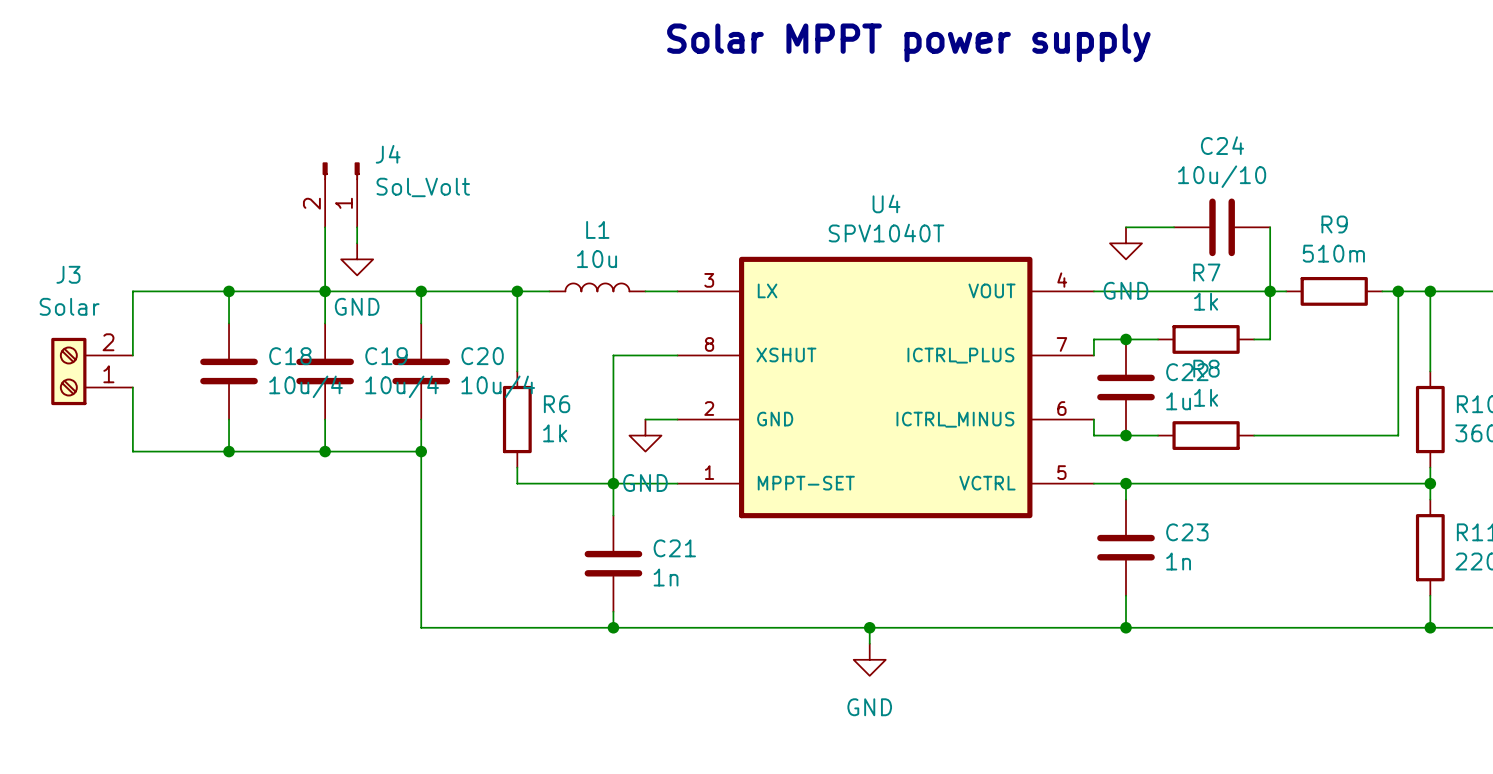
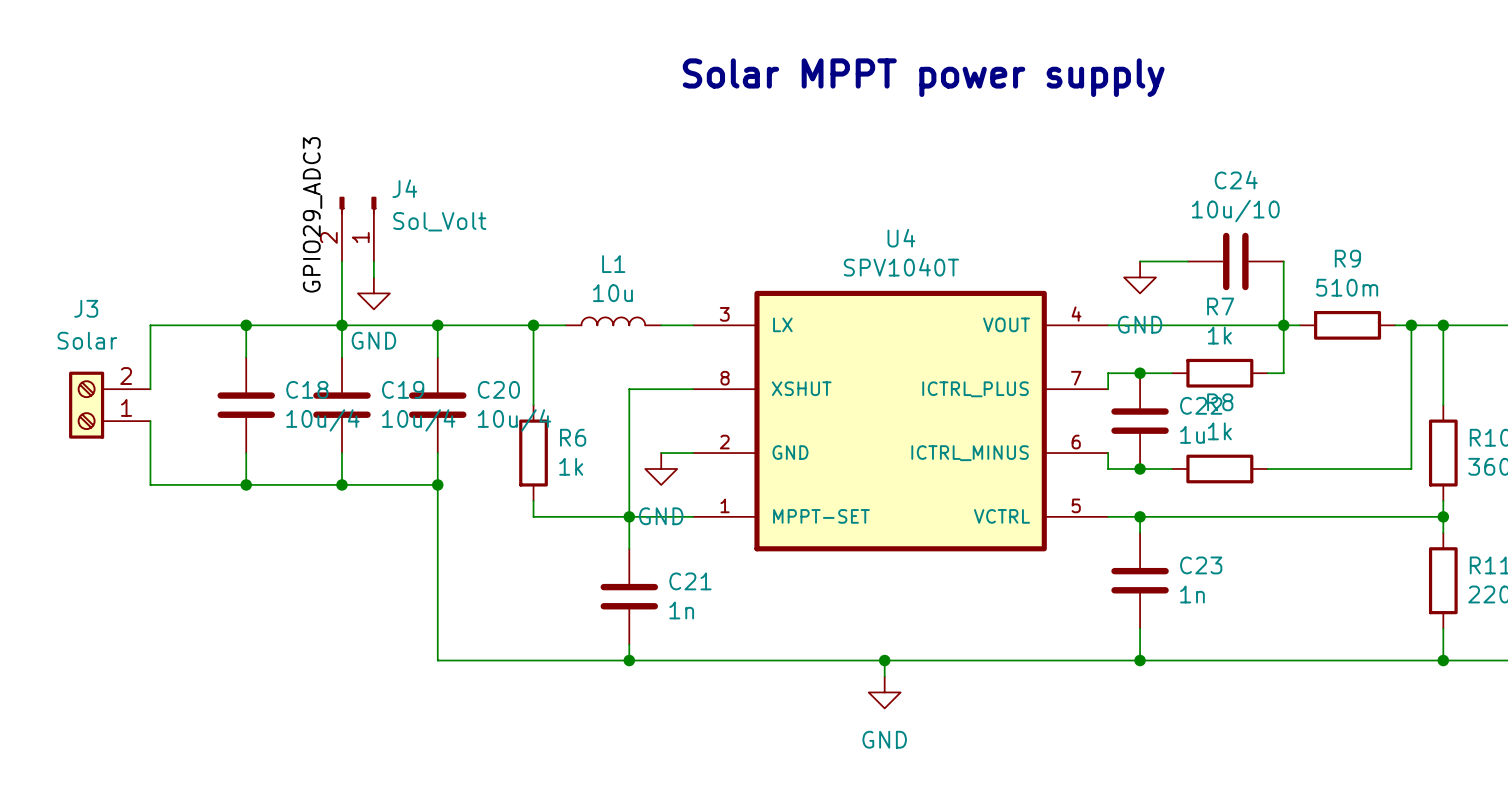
label: none -> GPIO29_ADC3 (312, 214)

